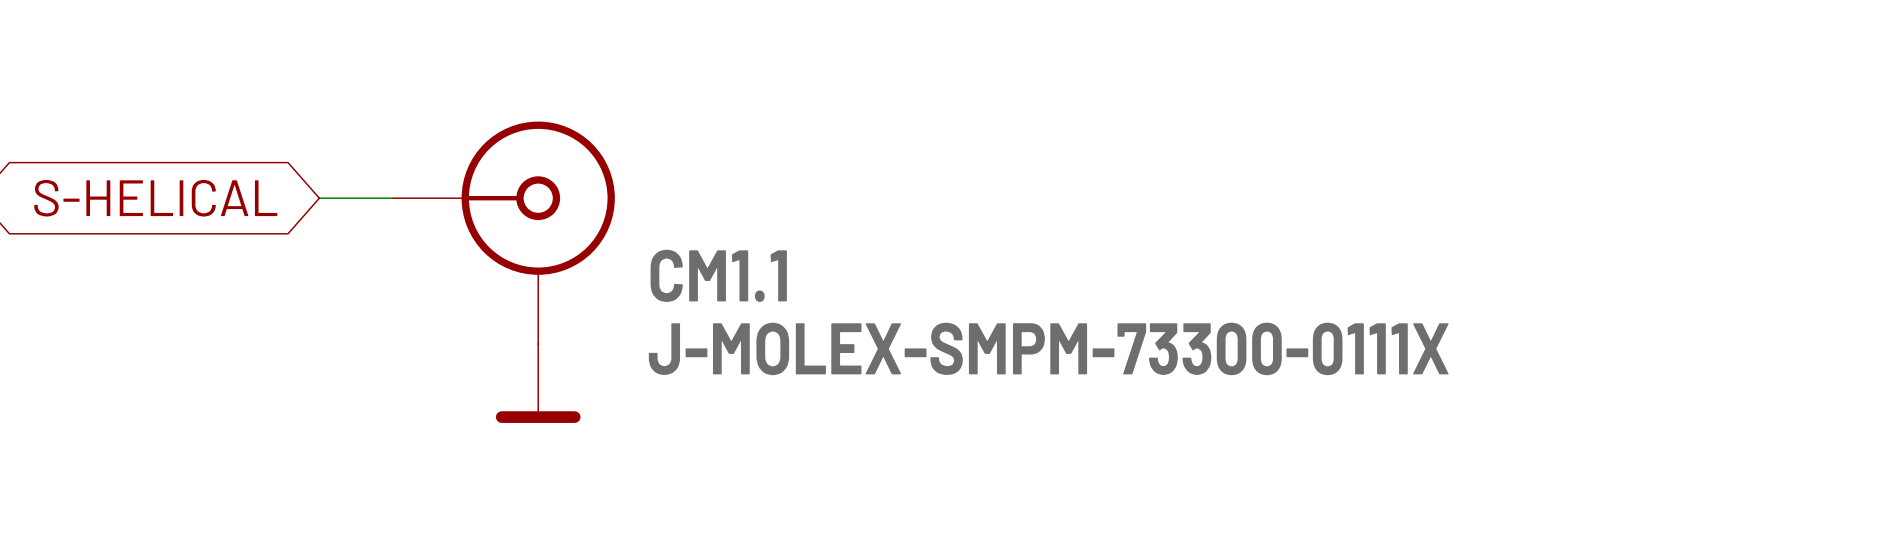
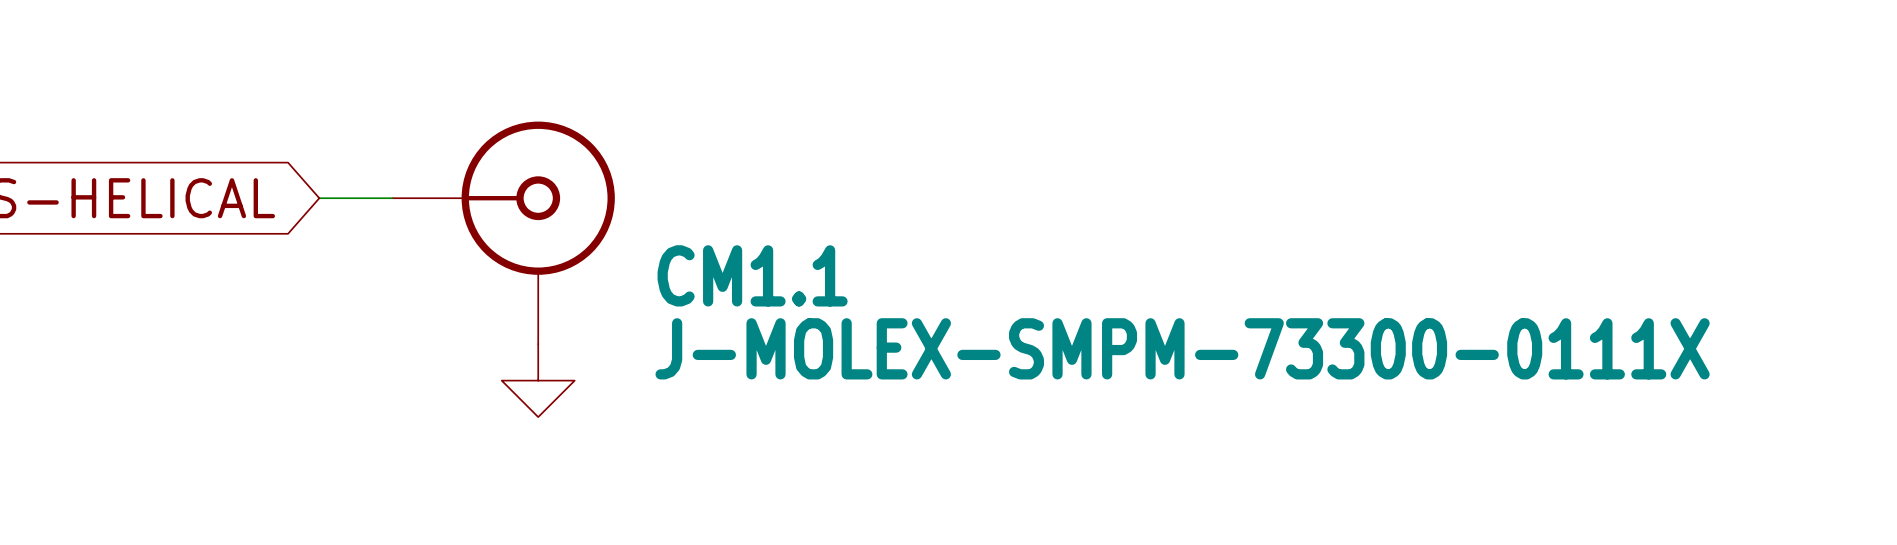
power symbol shape: [495, 344, 581, 423] -> [501, 344, 575, 418]

